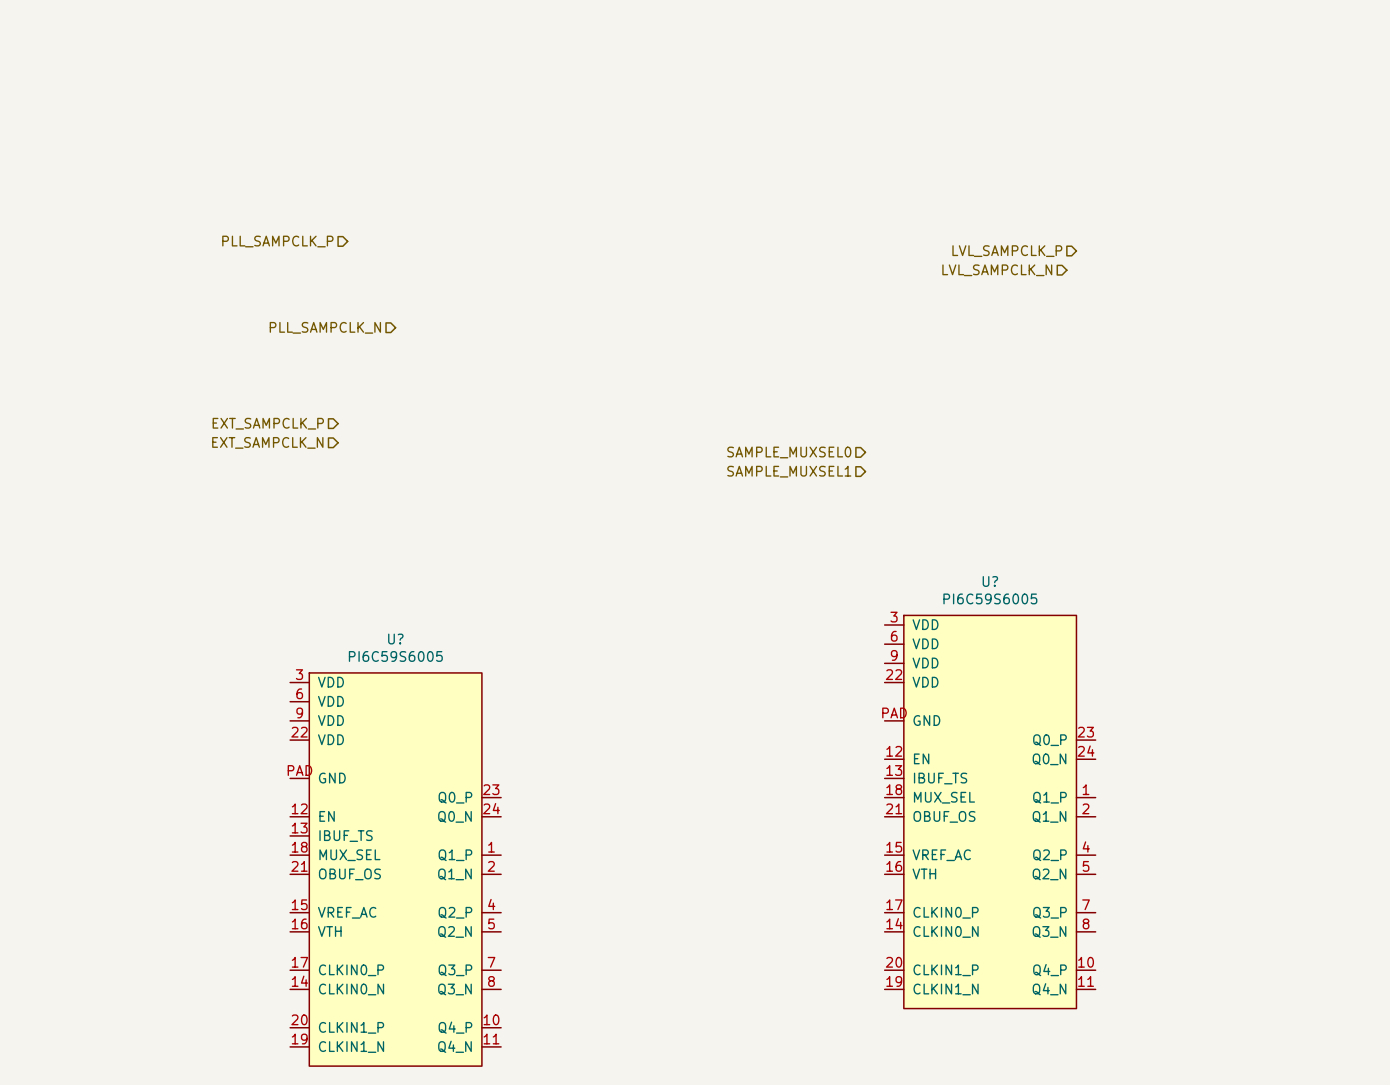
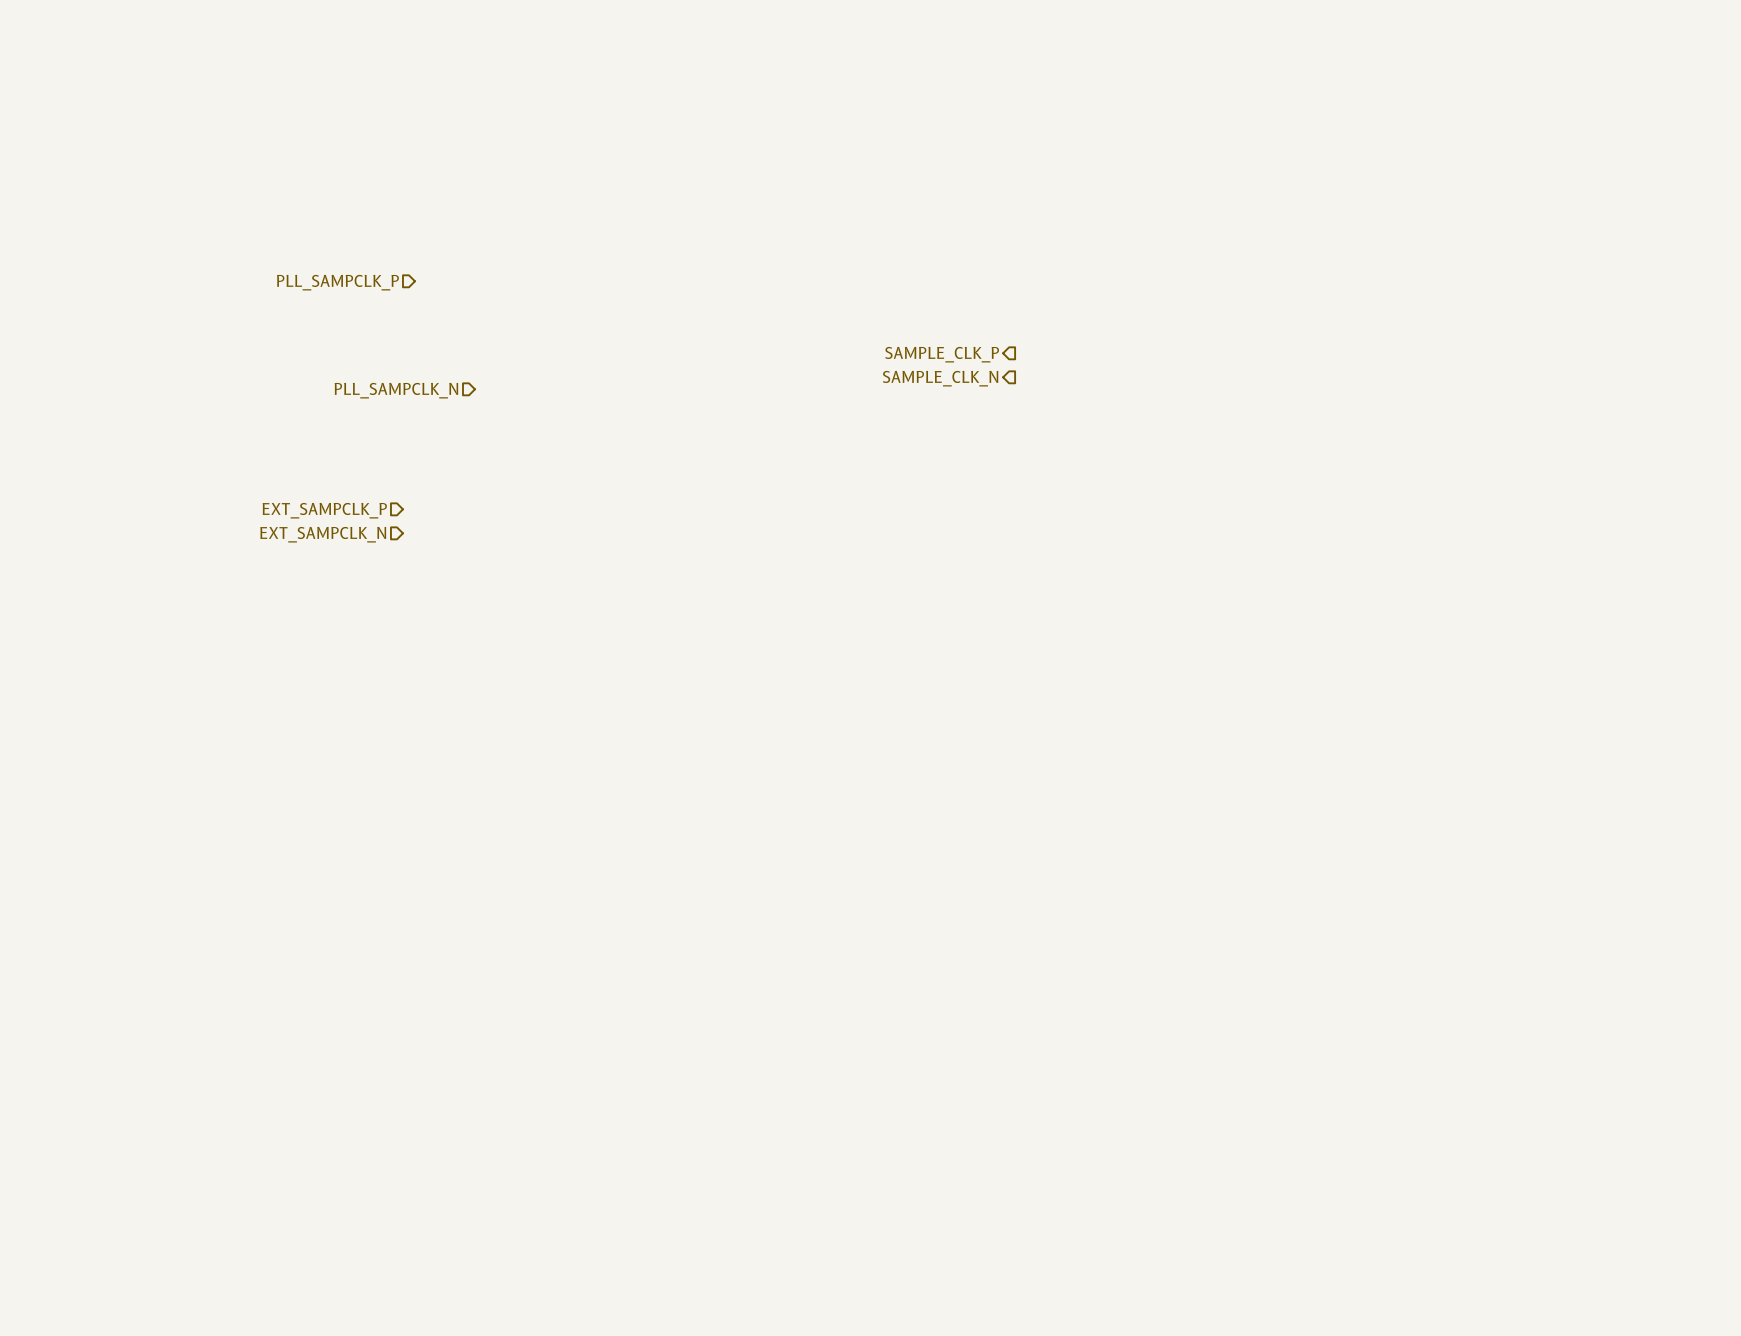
hierarchical label: LVL_SAMPCLK_P (1007, 251) -> none
hierarchical label: LVL_SAMPCLK_N (997, 270) -> none
hierarchical label: none -> SAMPLE_CLK_P (942, 354)
hierarchical label: none -> SAMPLE_CLK_N (940, 378)
hierarchical label: SAMPLE_MUXSEL0 (789, 452) -> none
hierarchical label: SAMPLE_MUXSEL1 (789, 471) -> none
U?: PI6C59S6005 (990, 811) -> none
U?: PI6C59S6005 (395, 869) -> none

